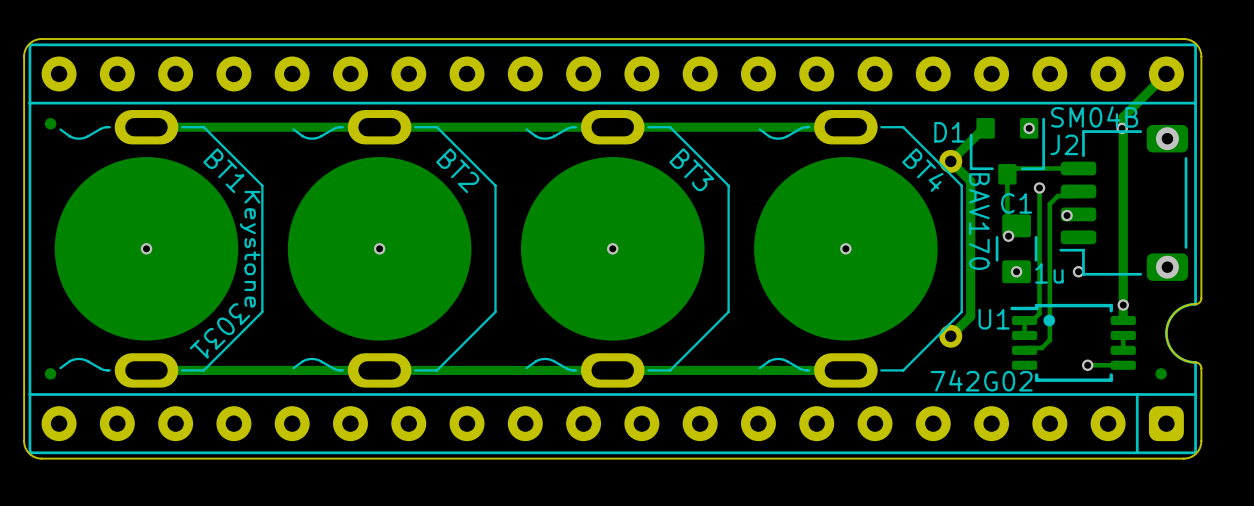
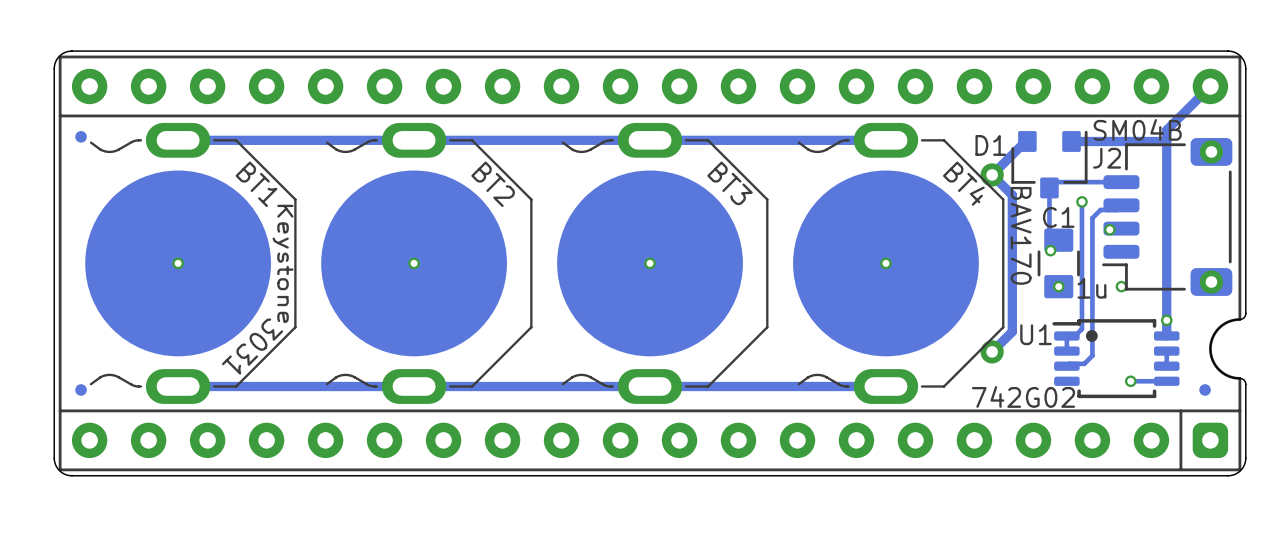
via: (1029, 128) -> none
track: none -> (1165, 141) (1071, 141)
via: (1122, 128) -> none

